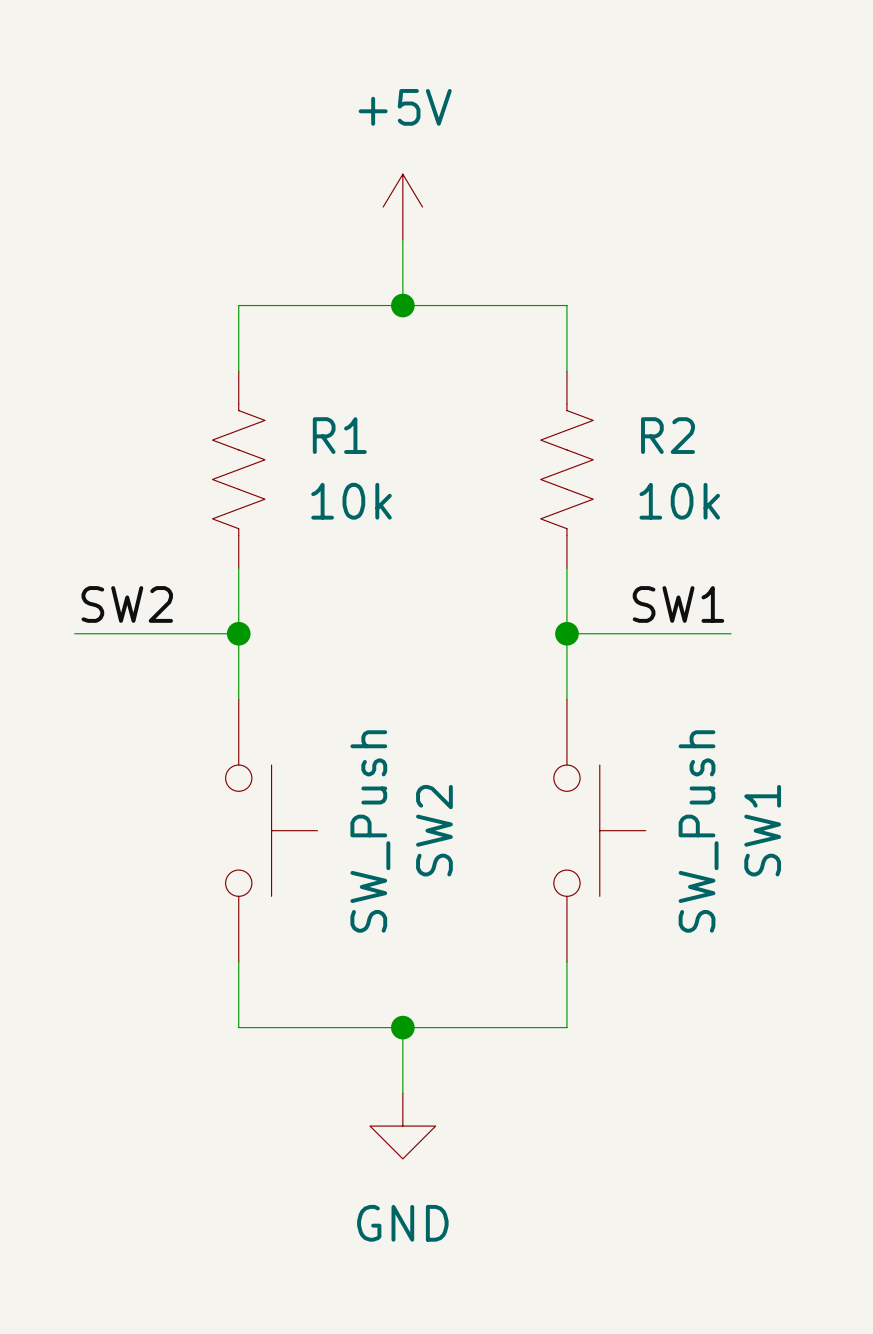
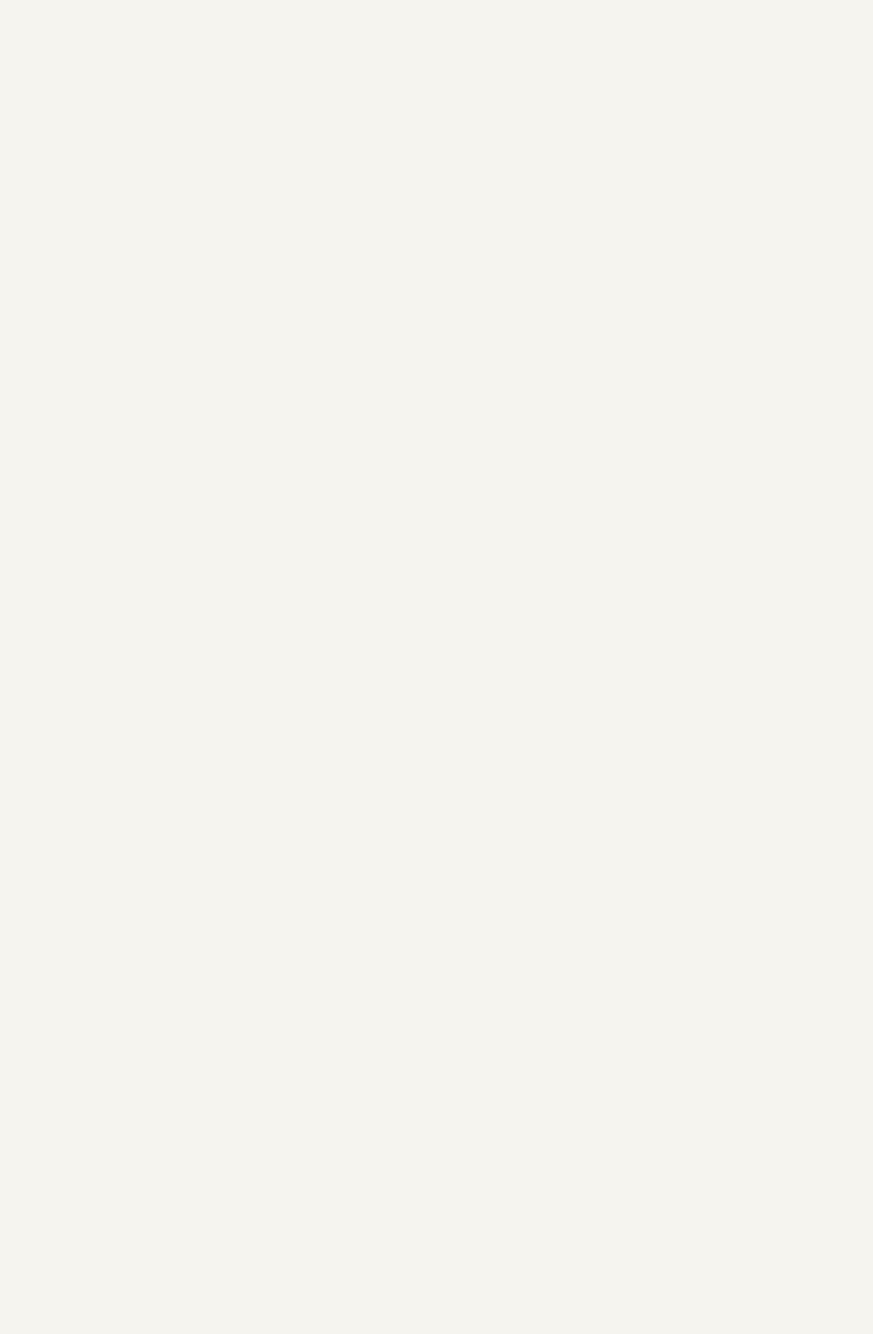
power symbol: +5V (402, 207) -> none
wire: (402, 239) (402, 305) -> none
junction: (402, 305) -> none
wire: (238, 371) (238, 305) (566, 305) (566, 371) -> none
R1: 10k (238, 469) -> none
R2: 10k (566, 469) -> none
wire: (238, 568) (238, 699) -> none
wire: (566, 568) (566, 699) -> none
label: SW2 (127, 604) -> none
label: SW1 (678, 604) -> none
wire: (74, 633) (238, 633) -> none
junction: (238, 633) -> none
wire: (566, 633) (731, 633) -> none
junction: (566, 633) -> none
SW2: SW_Push (271, 830) -> none
SW1: SW_Push (599, 830) -> none
wire: (238, 961) (238, 1027) (566, 1027) (566, 961) -> none
wire: (402, 1027) (402, 1093) -> none
junction: (402, 1027) -> none
power symbol: GND (402, 1126) -> none

